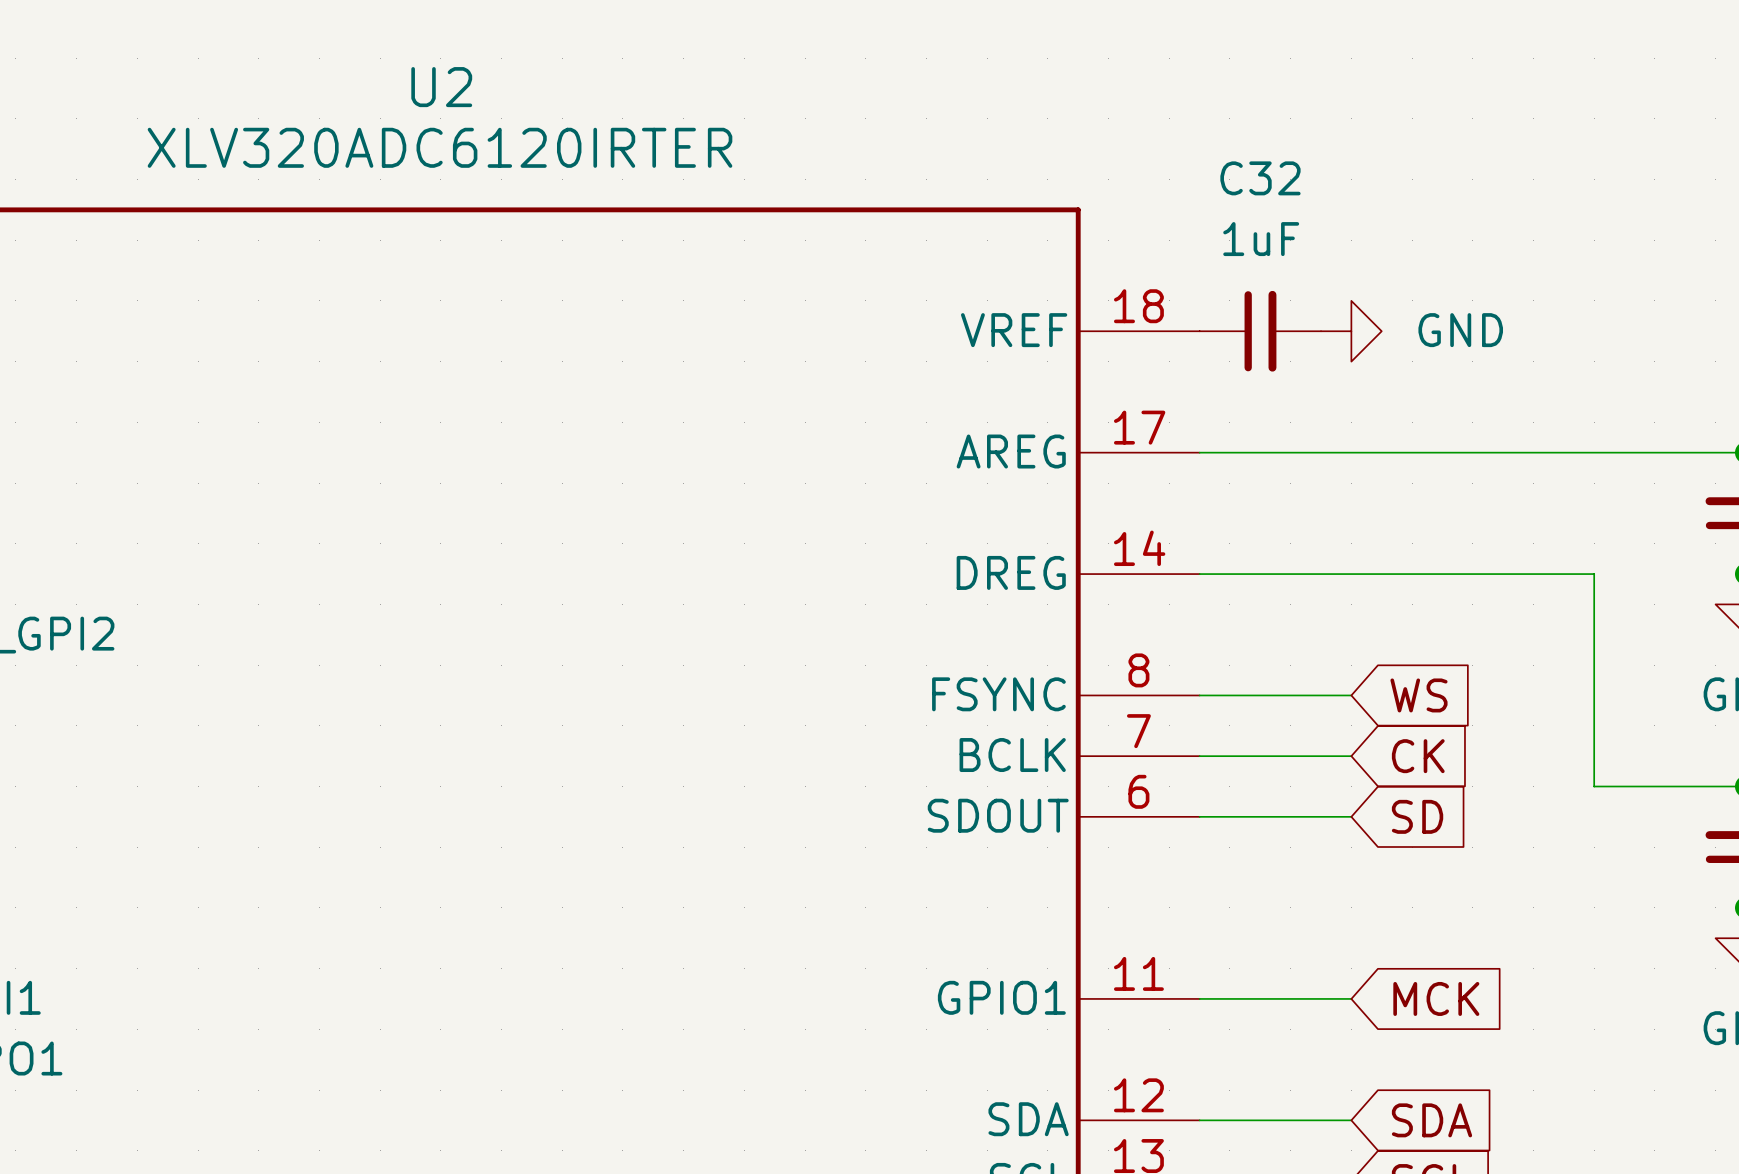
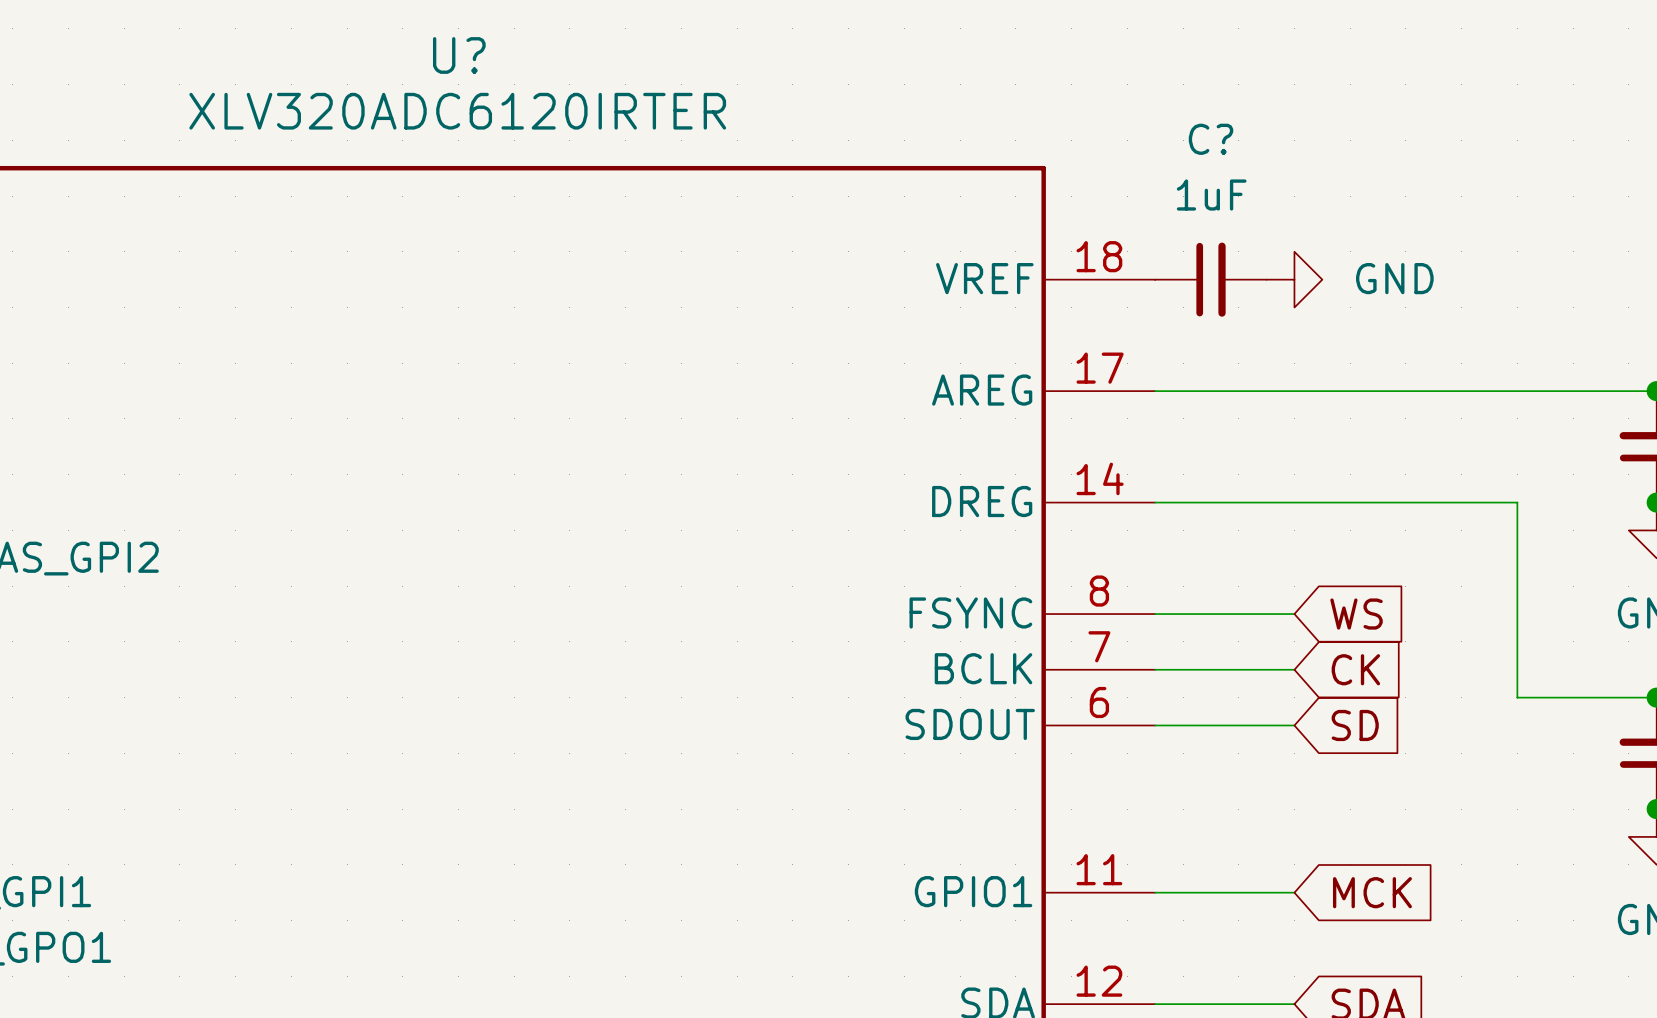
U2 name: U2 (441, 87) -> U? (459, 55)
C32 name: C32 (1260, 178) -> C? (1211, 139)

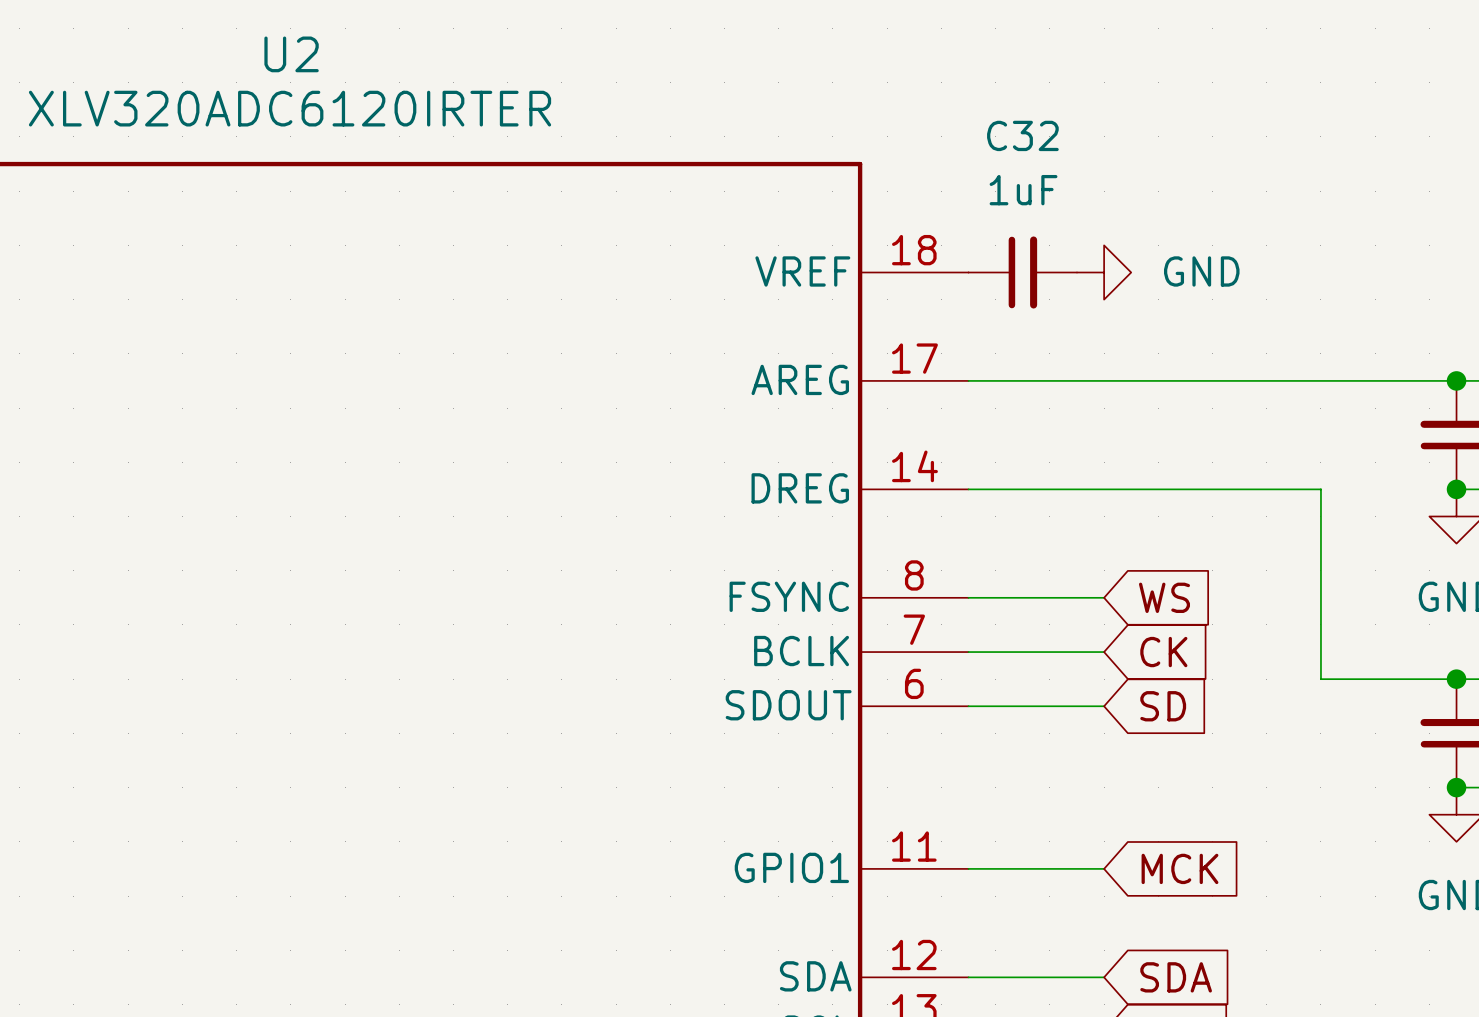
U? name: U? (459, 55) -> U2 (291, 54)
C? name: C? (1211, 139) -> C32 (1022, 135)

